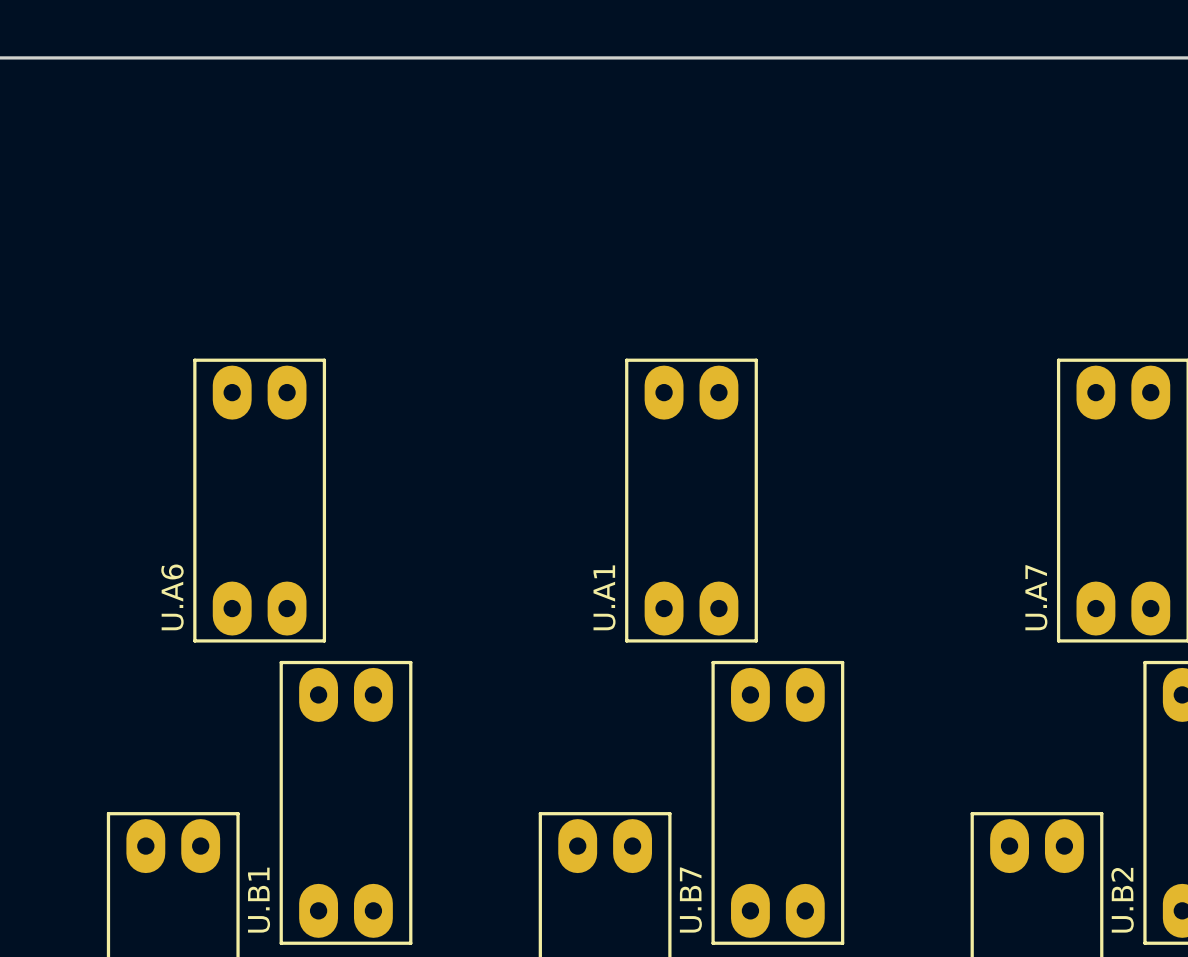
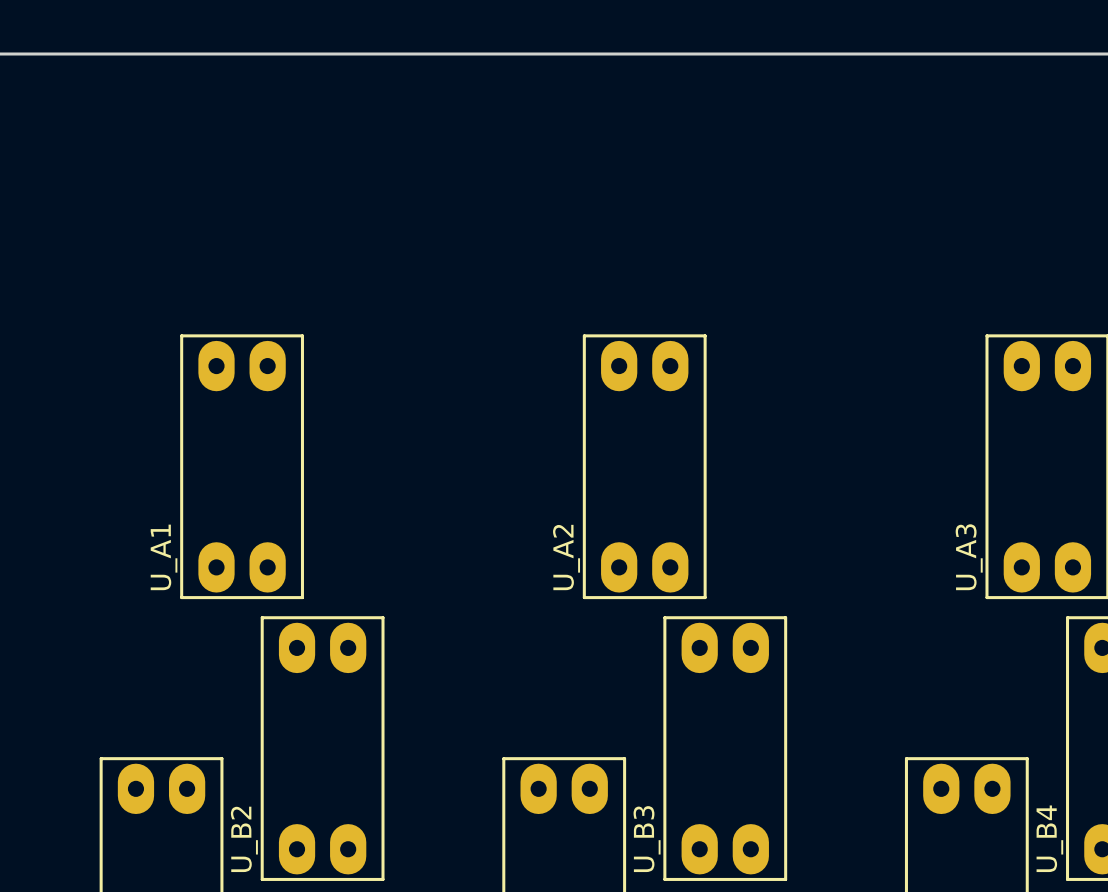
U.A6 name: U.A6 (172, 597) -> U_A1 (164, 557)
U.A1 name: U.A1 (604, 597) -> U_A2 (566, 557)
U.A7 name: U.A7 (1036, 597) -> U_A3 (969, 557)
U.B1 name: U.B1 (259, 900) -> U_B2 (244, 839)
U.B7 name: U.B7 (690, 900) -> U_B3 (647, 839)
U.B2 name: U.B2 (1122, 900) -> U_B4 (1049, 838)

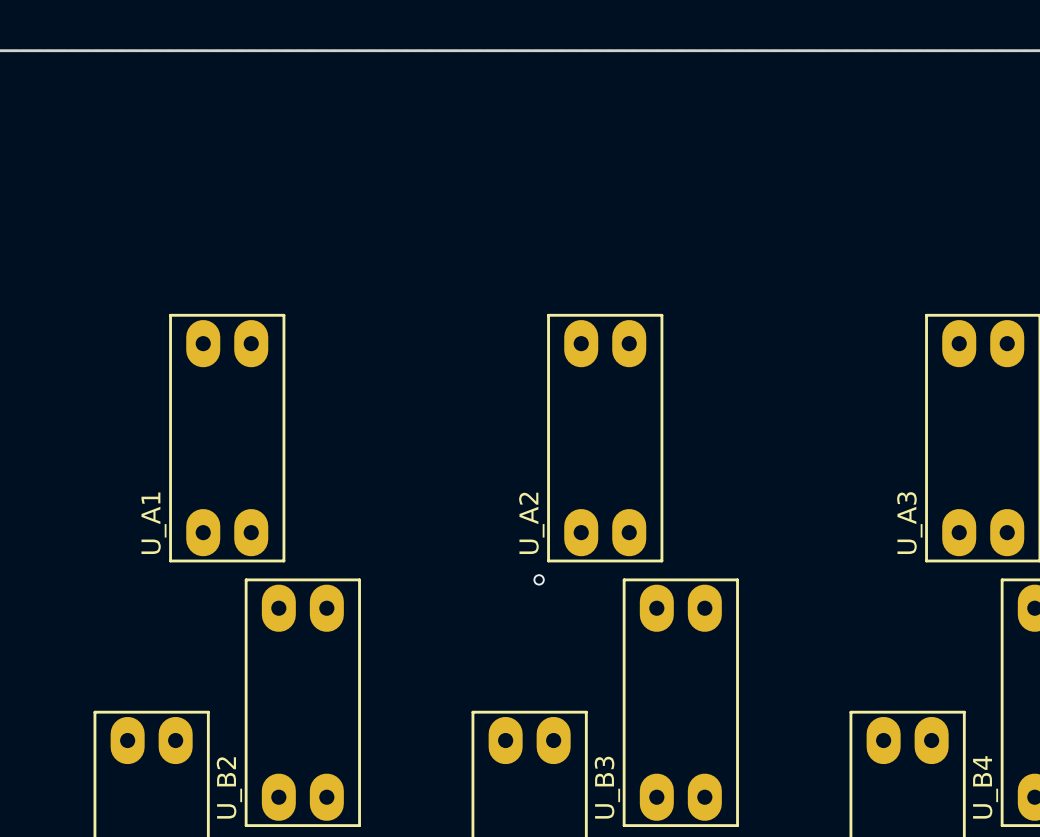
via: none -> (539, 579)

